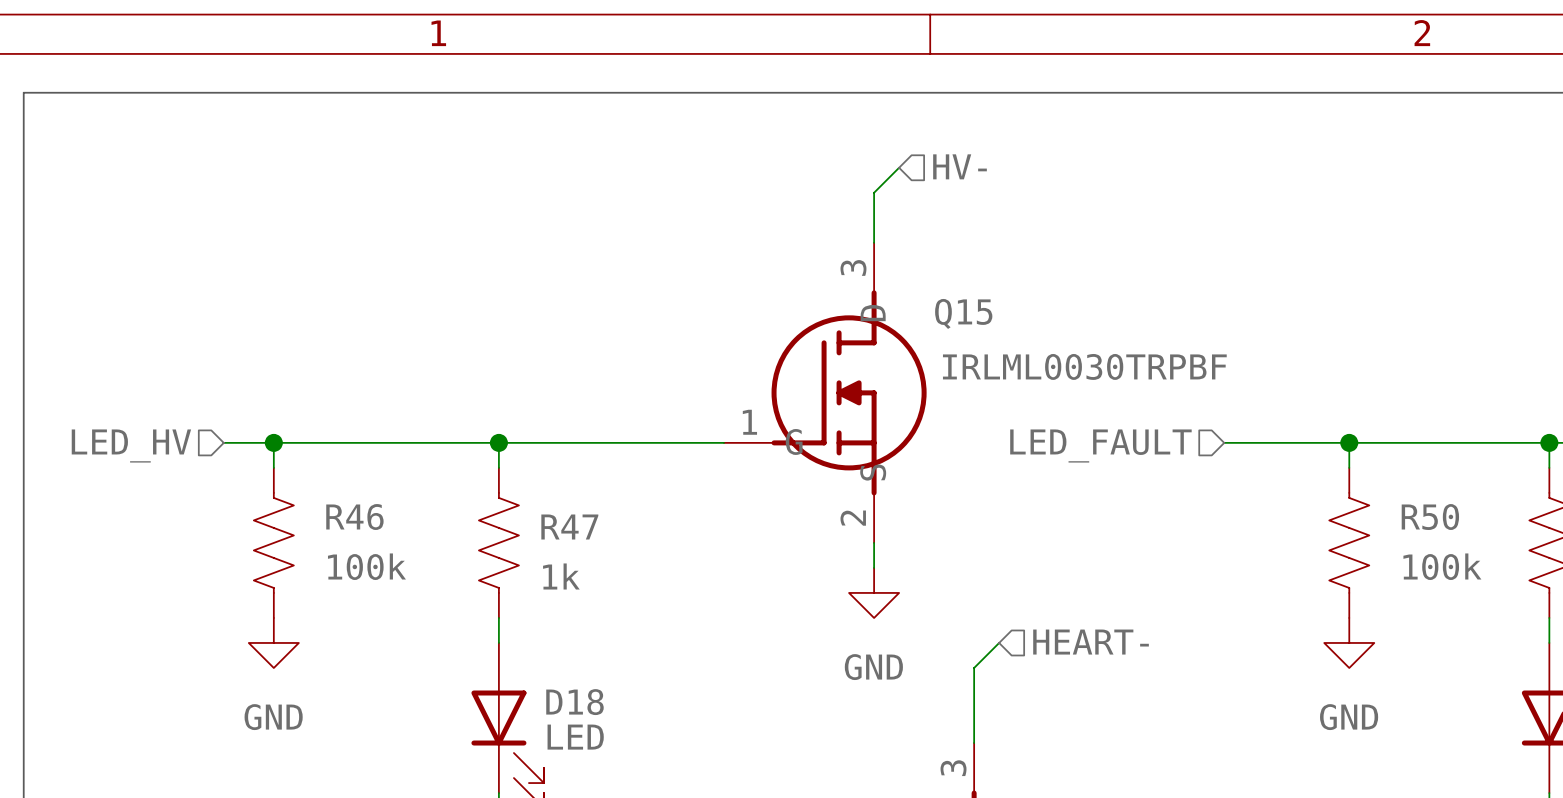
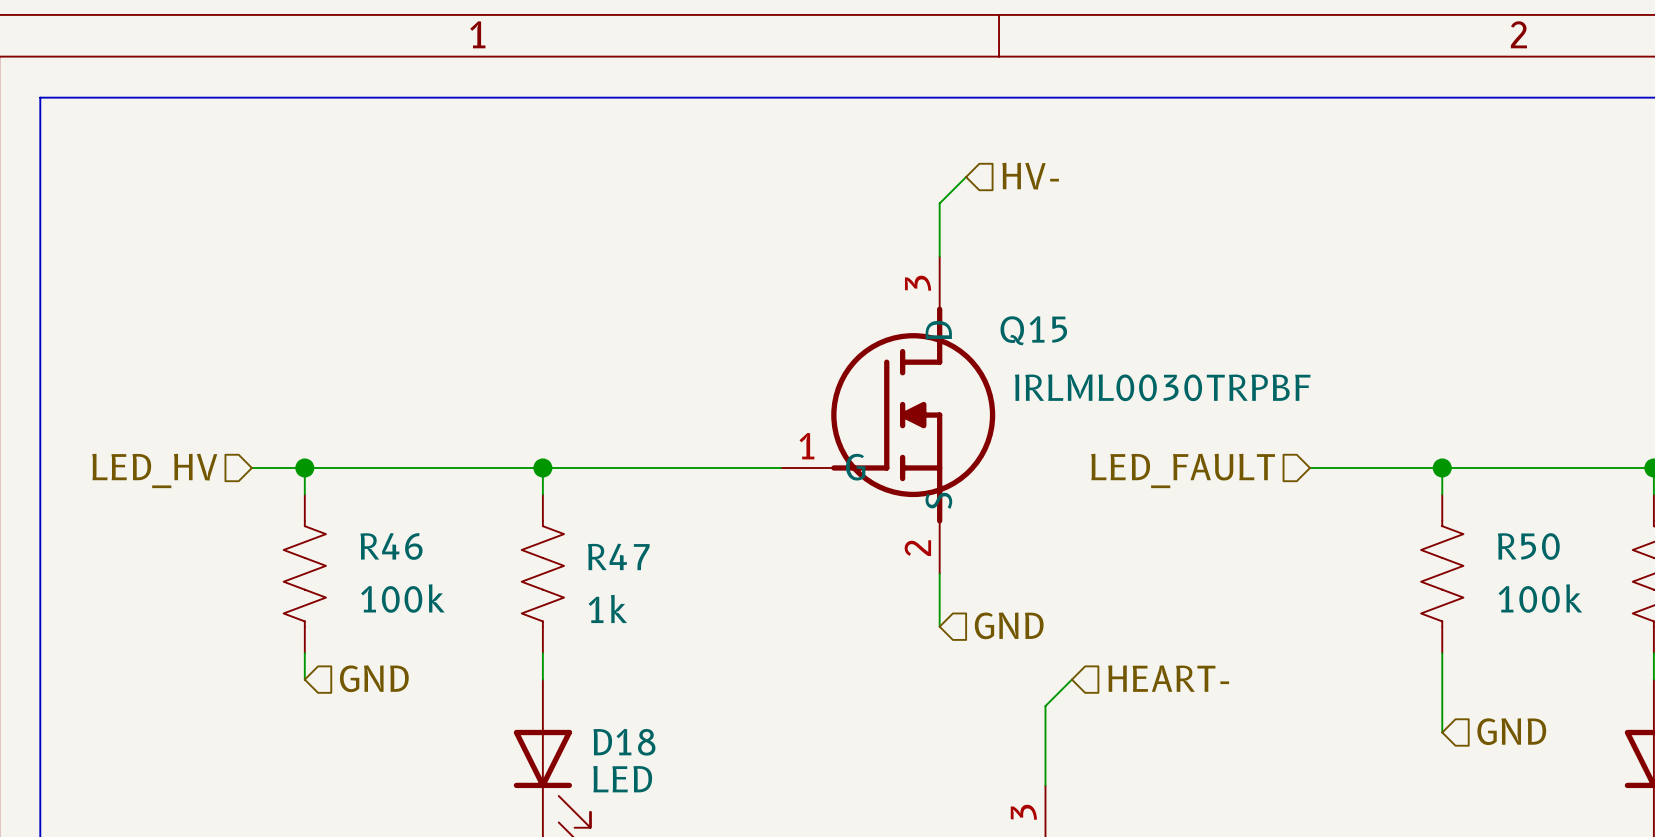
power symbol: GND (874, 592) -> none
hierarchical label: none -> GND (1009, 625)
wire: none -> (1442, 653) (1442, 732)
power symbol: GND (273, 642) -> none
hierarchical label: none -> GND (374, 678)
power symbol: GND (1349, 642) -> none
hierarchical label: none -> GND (1511, 731)

